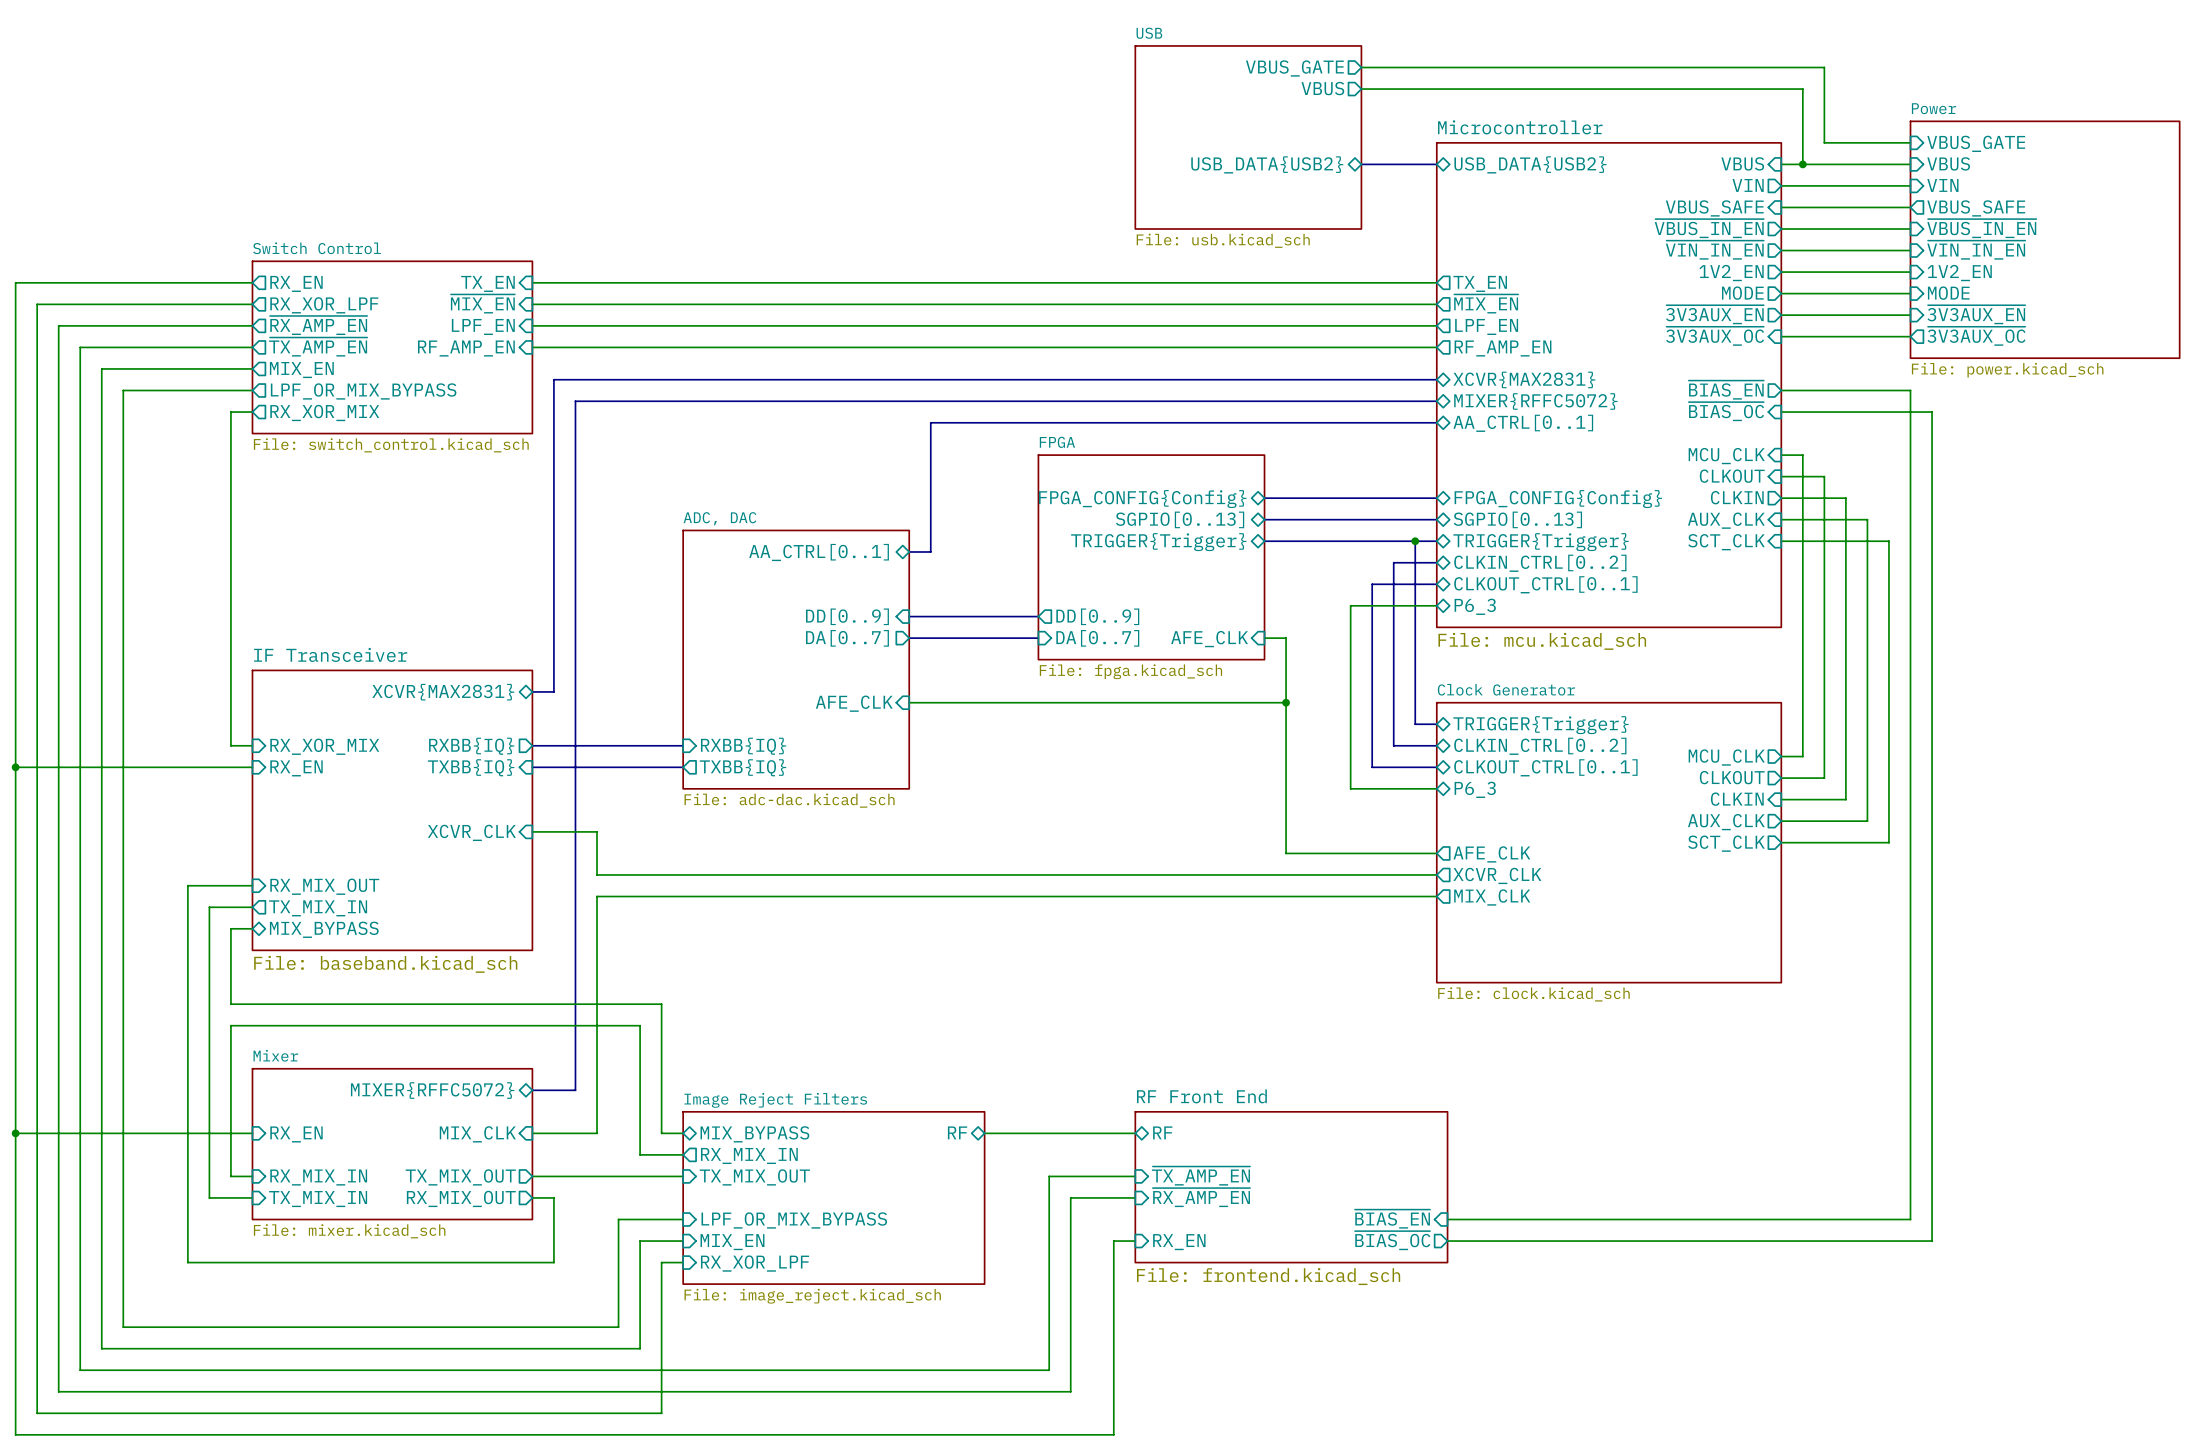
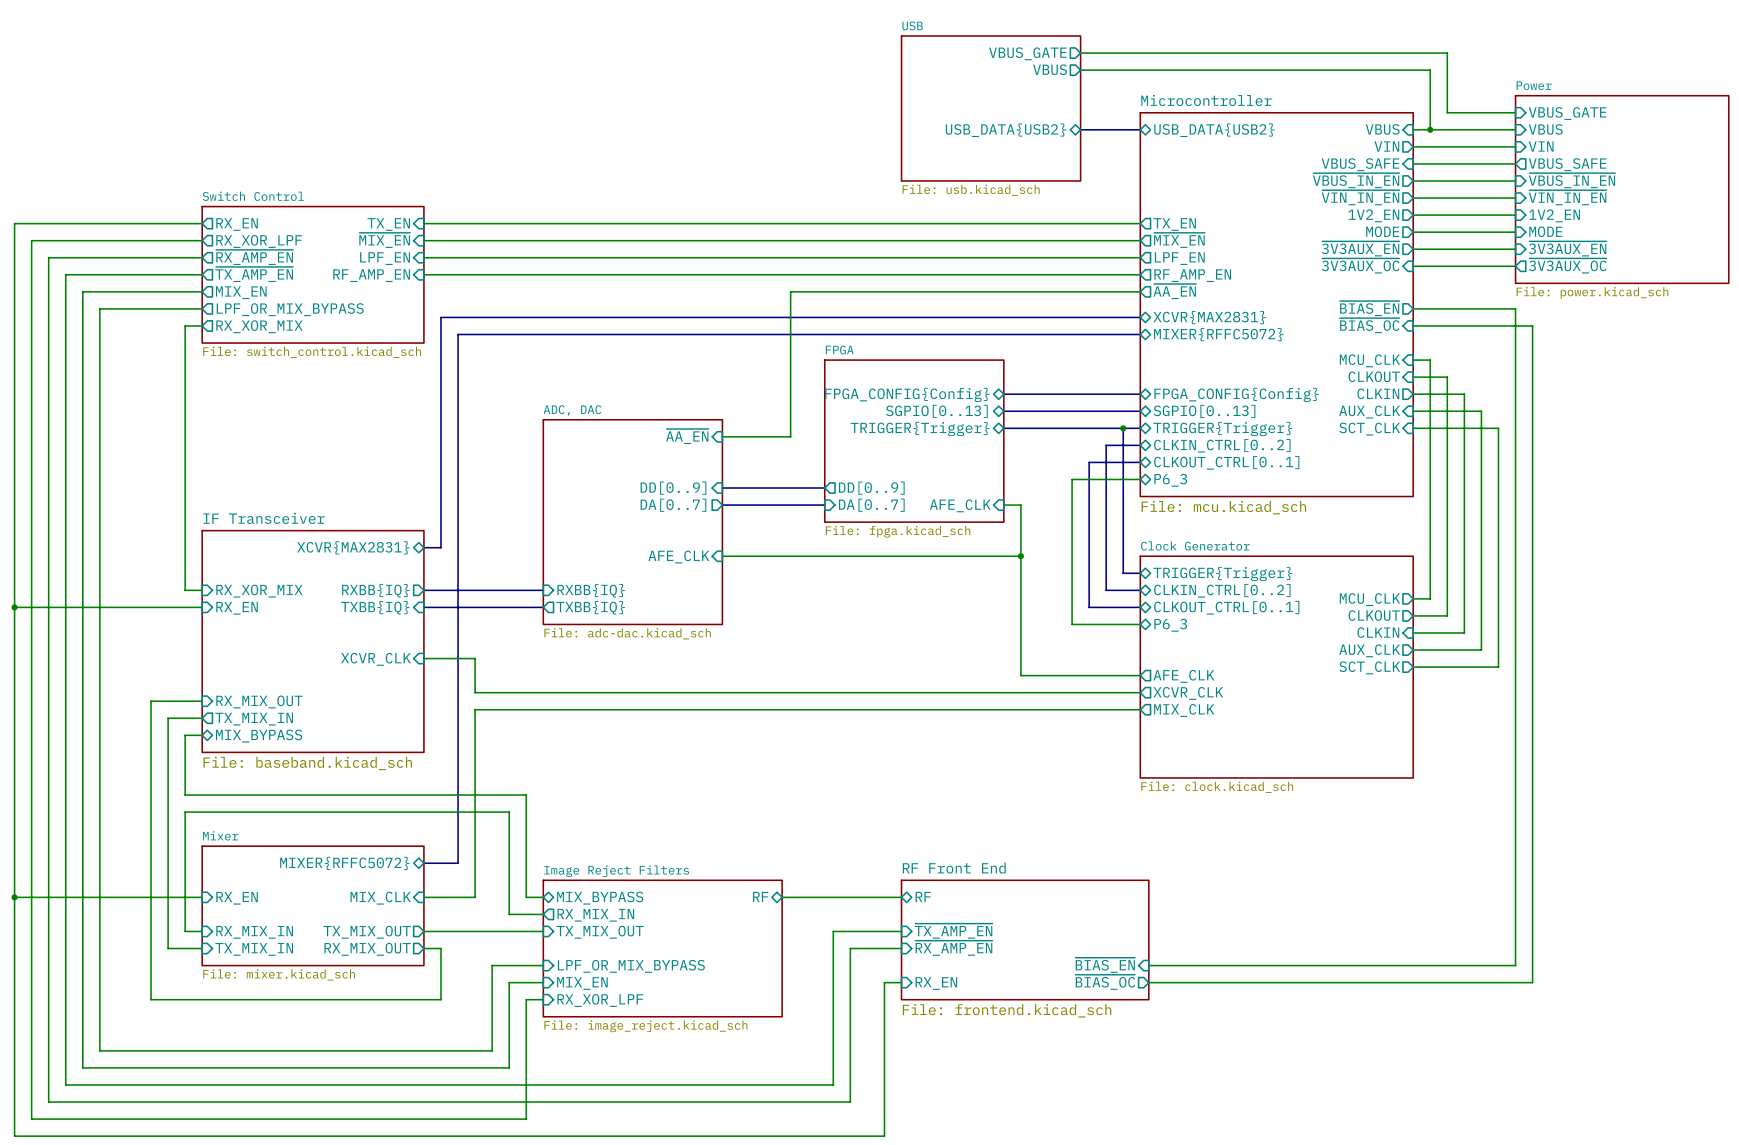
wire: none -> (1140, 291) (790, 291) (790, 436) (722, 436)
sheet pin: none -> ~{AA_EN} (1174, 291)
bus: (1436, 379) (553, 379) (553, 401) -> none
sheet pin: XCVR{MAX2831} (1524, 379) -> none
bus: (575, 401) (575, 422) -> (458, 317) (440, 317)
sheet pin: MIXER{RFFC5072} (1535, 401) -> XCVR{MAX2831} (1209, 317)
bus: (930, 422) (930, 551) (909, 551) -> (739, 334) (458, 334)
sheet pin: AA_CTRL[0..1] (1523, 423) -> MIXER{RFFC5072} (1218, 334)
sheet pin shape: bidirectional (819, 552) -> input (687, 436)
sheet pin: AA_CTRL[0..1] (819, 552) -> ~{AA_EN} (687, 436)

